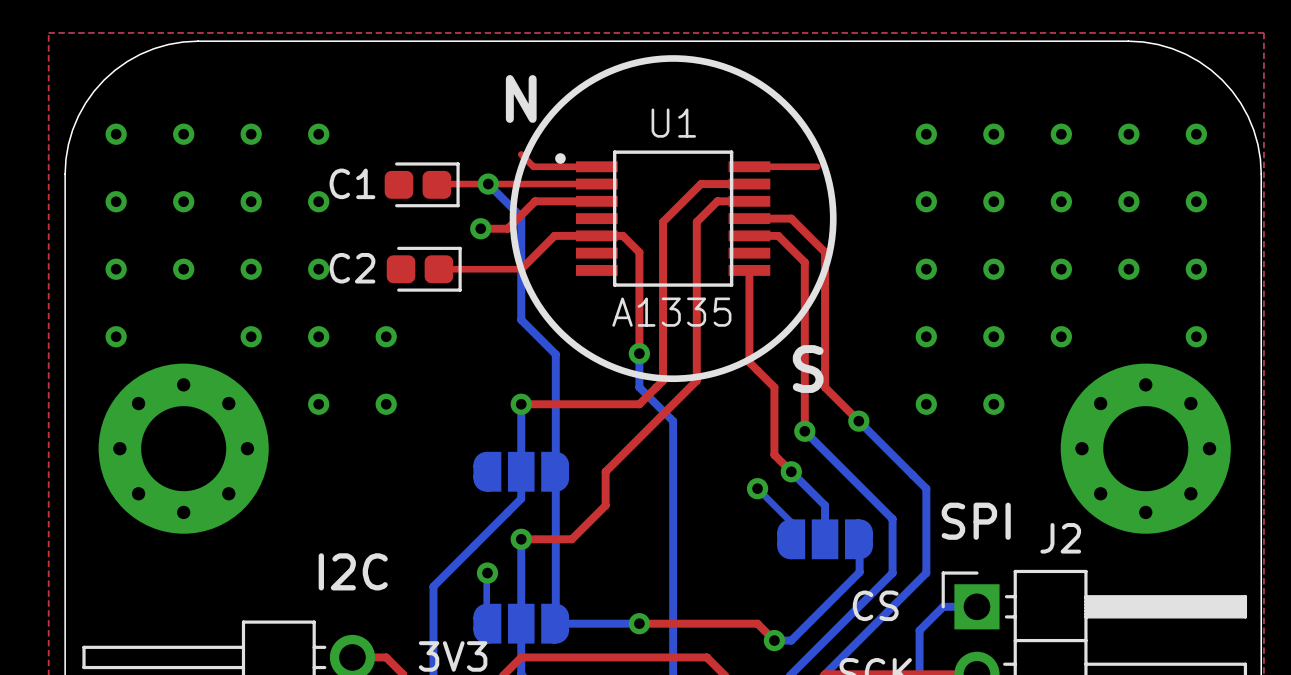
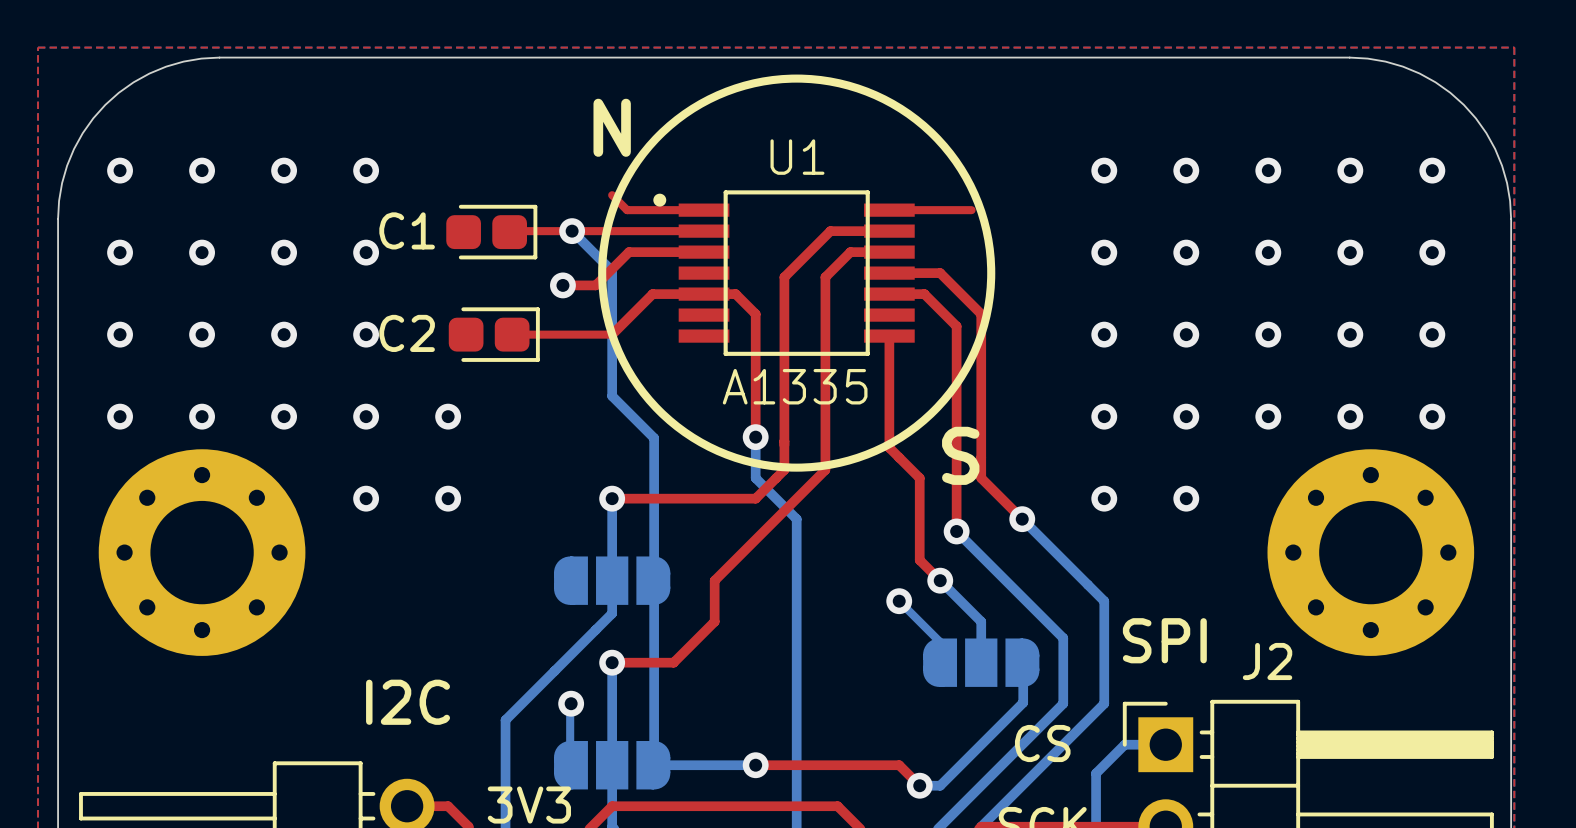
via: none -> (202, 416)
via: none -> (1350, 416)

